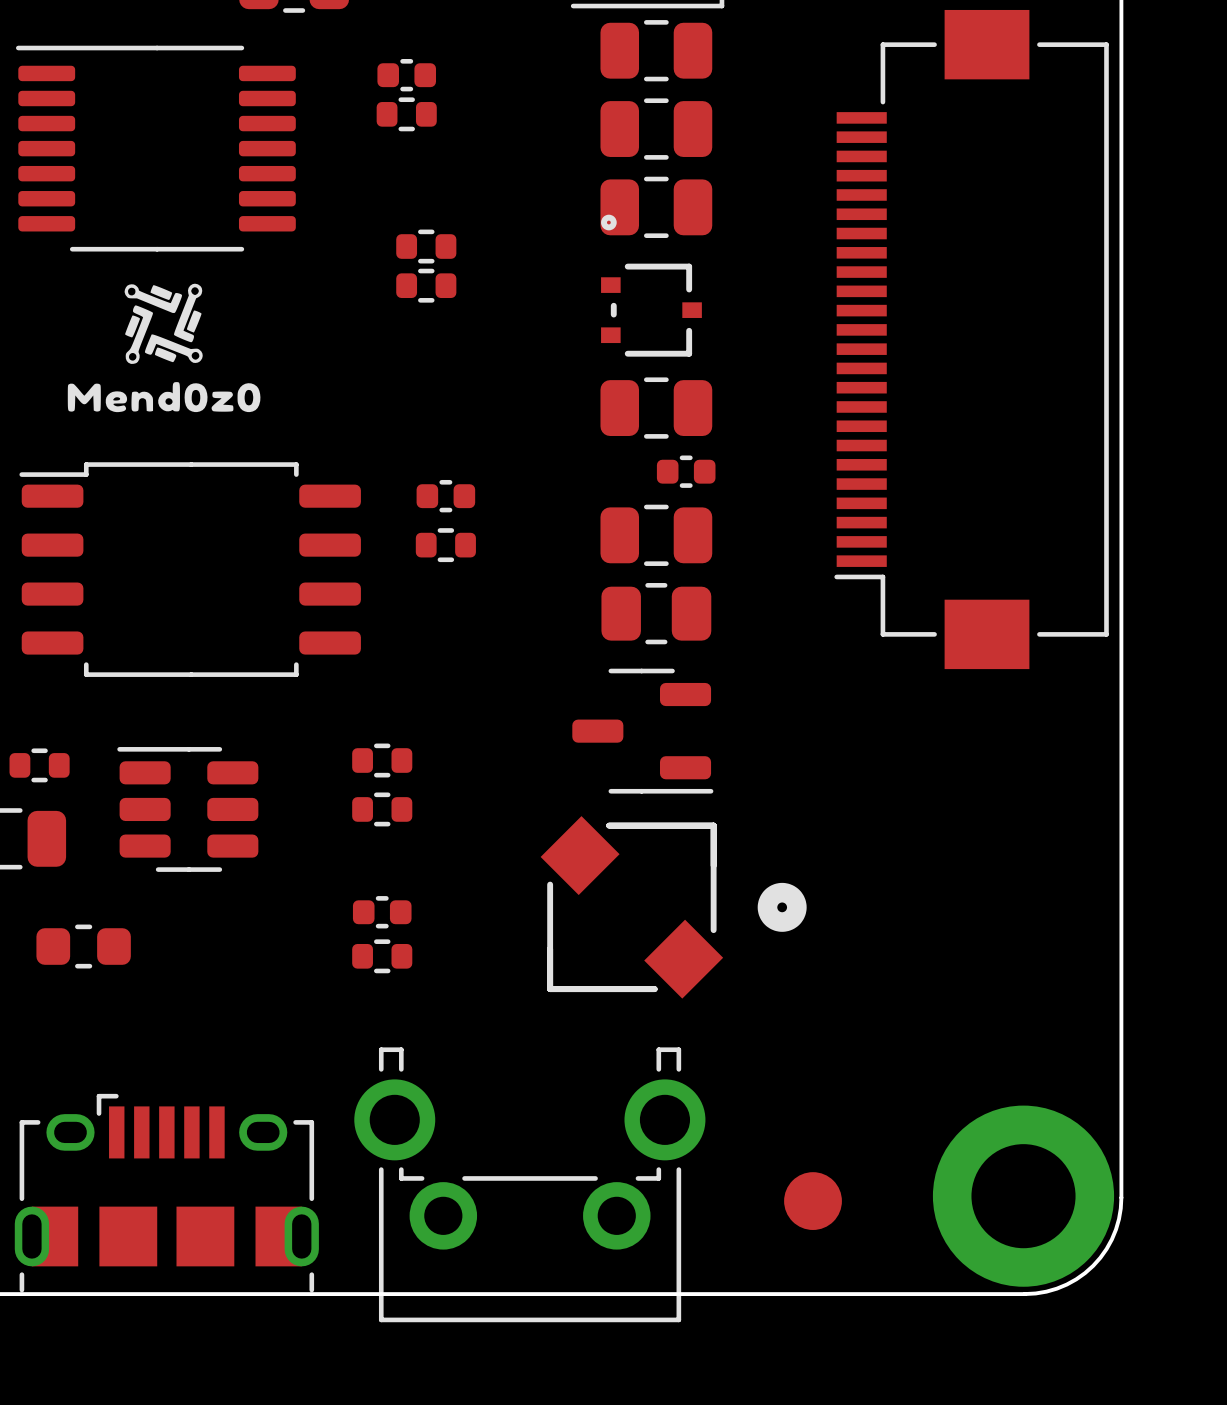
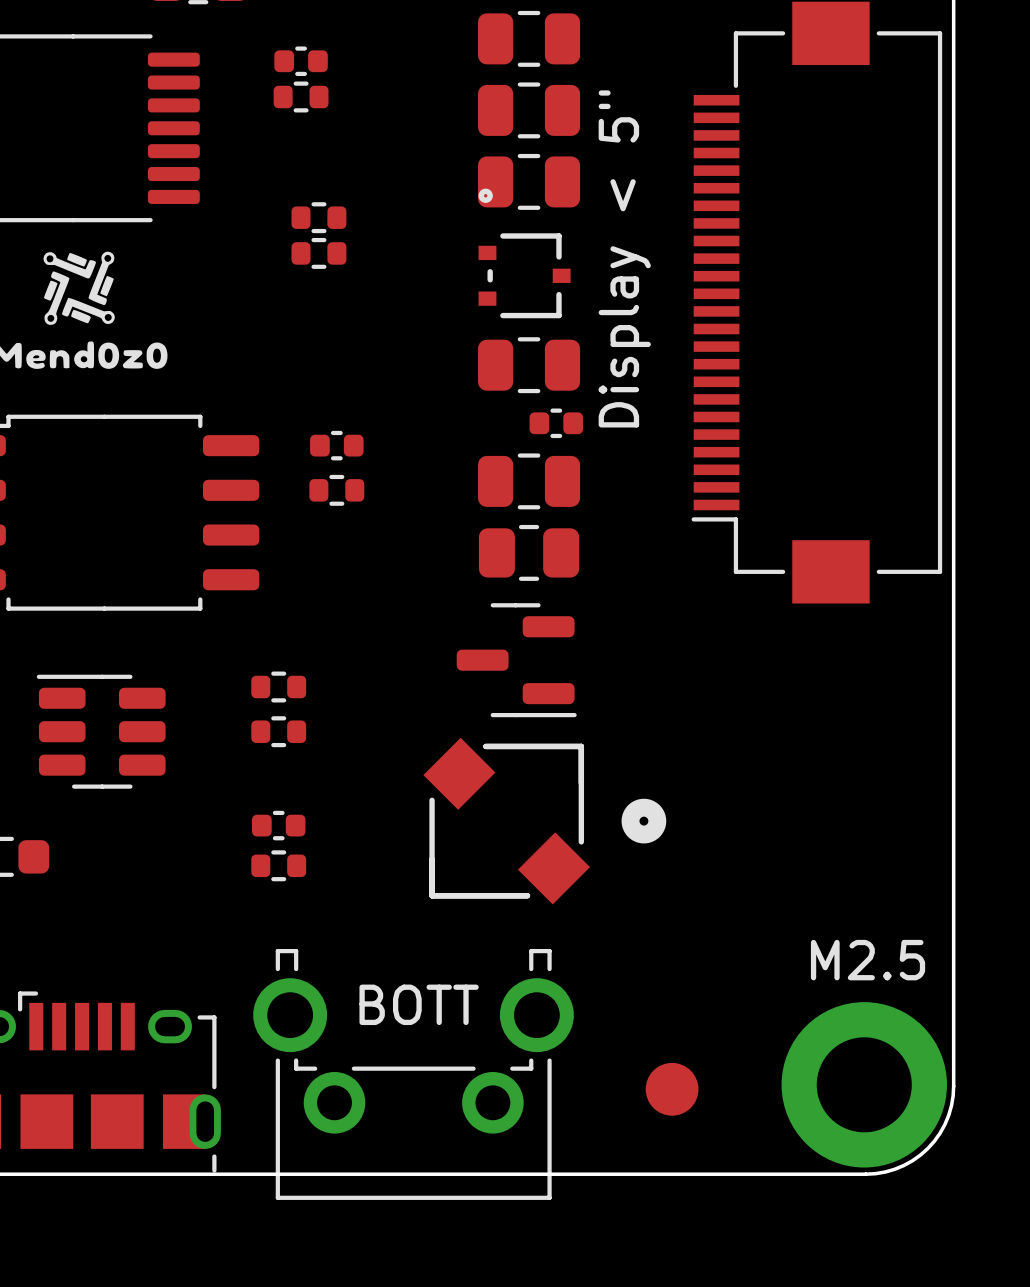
text: none -> Display < 5" (624, 258)
part footprint: [572, 668, 714, 794] -> [456, 603, 577, 718]
text: none -> M2.5 (868, 960)
text: none -> BOTT (419, 1004)

